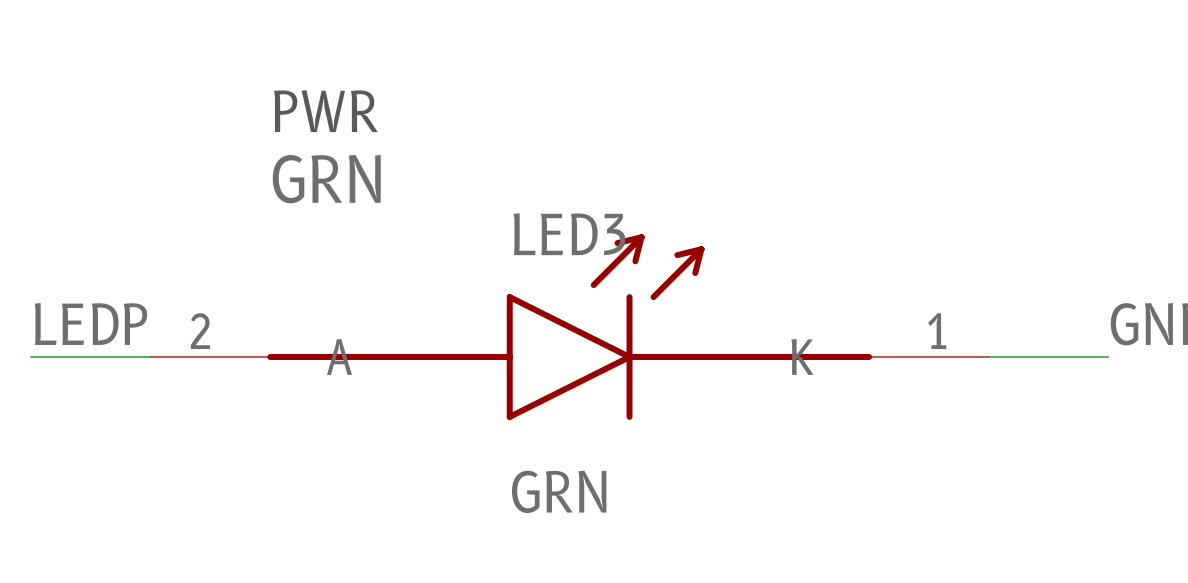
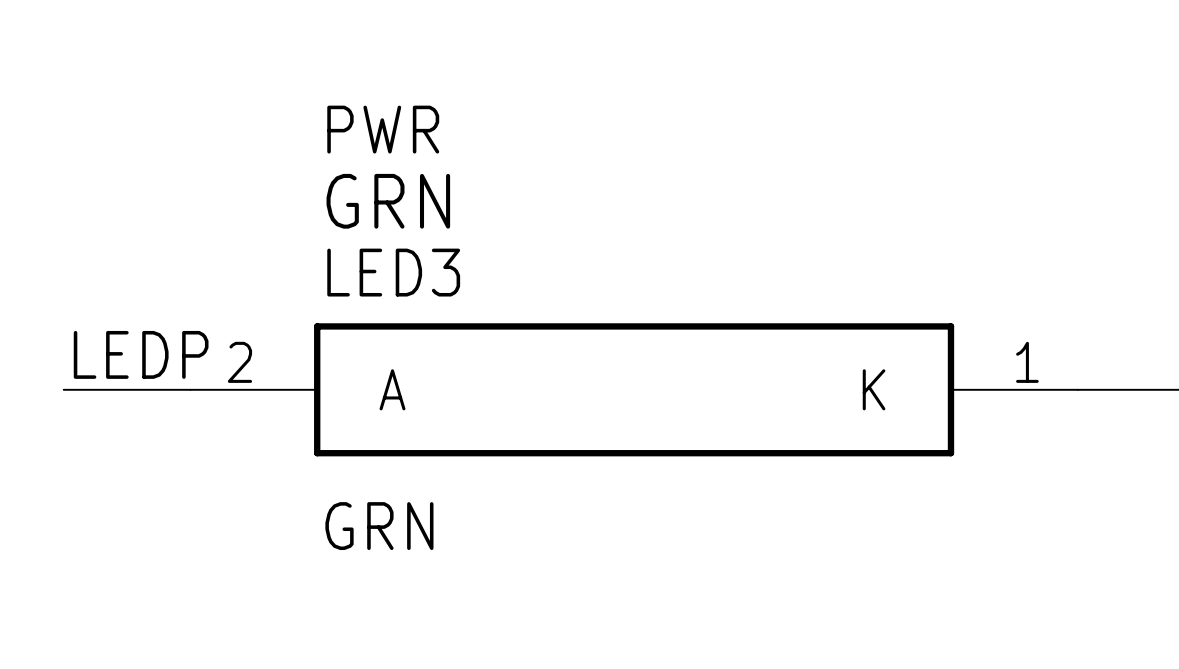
LED3 symbol: [150, 234, 989, 420] -> [190, 323, 1078, 457]
LED3 name position: LED3 (569, 234) -> LED3 (393, 272)
LED3 value position: GRN (559, 491) -> GRN (379, 526)

